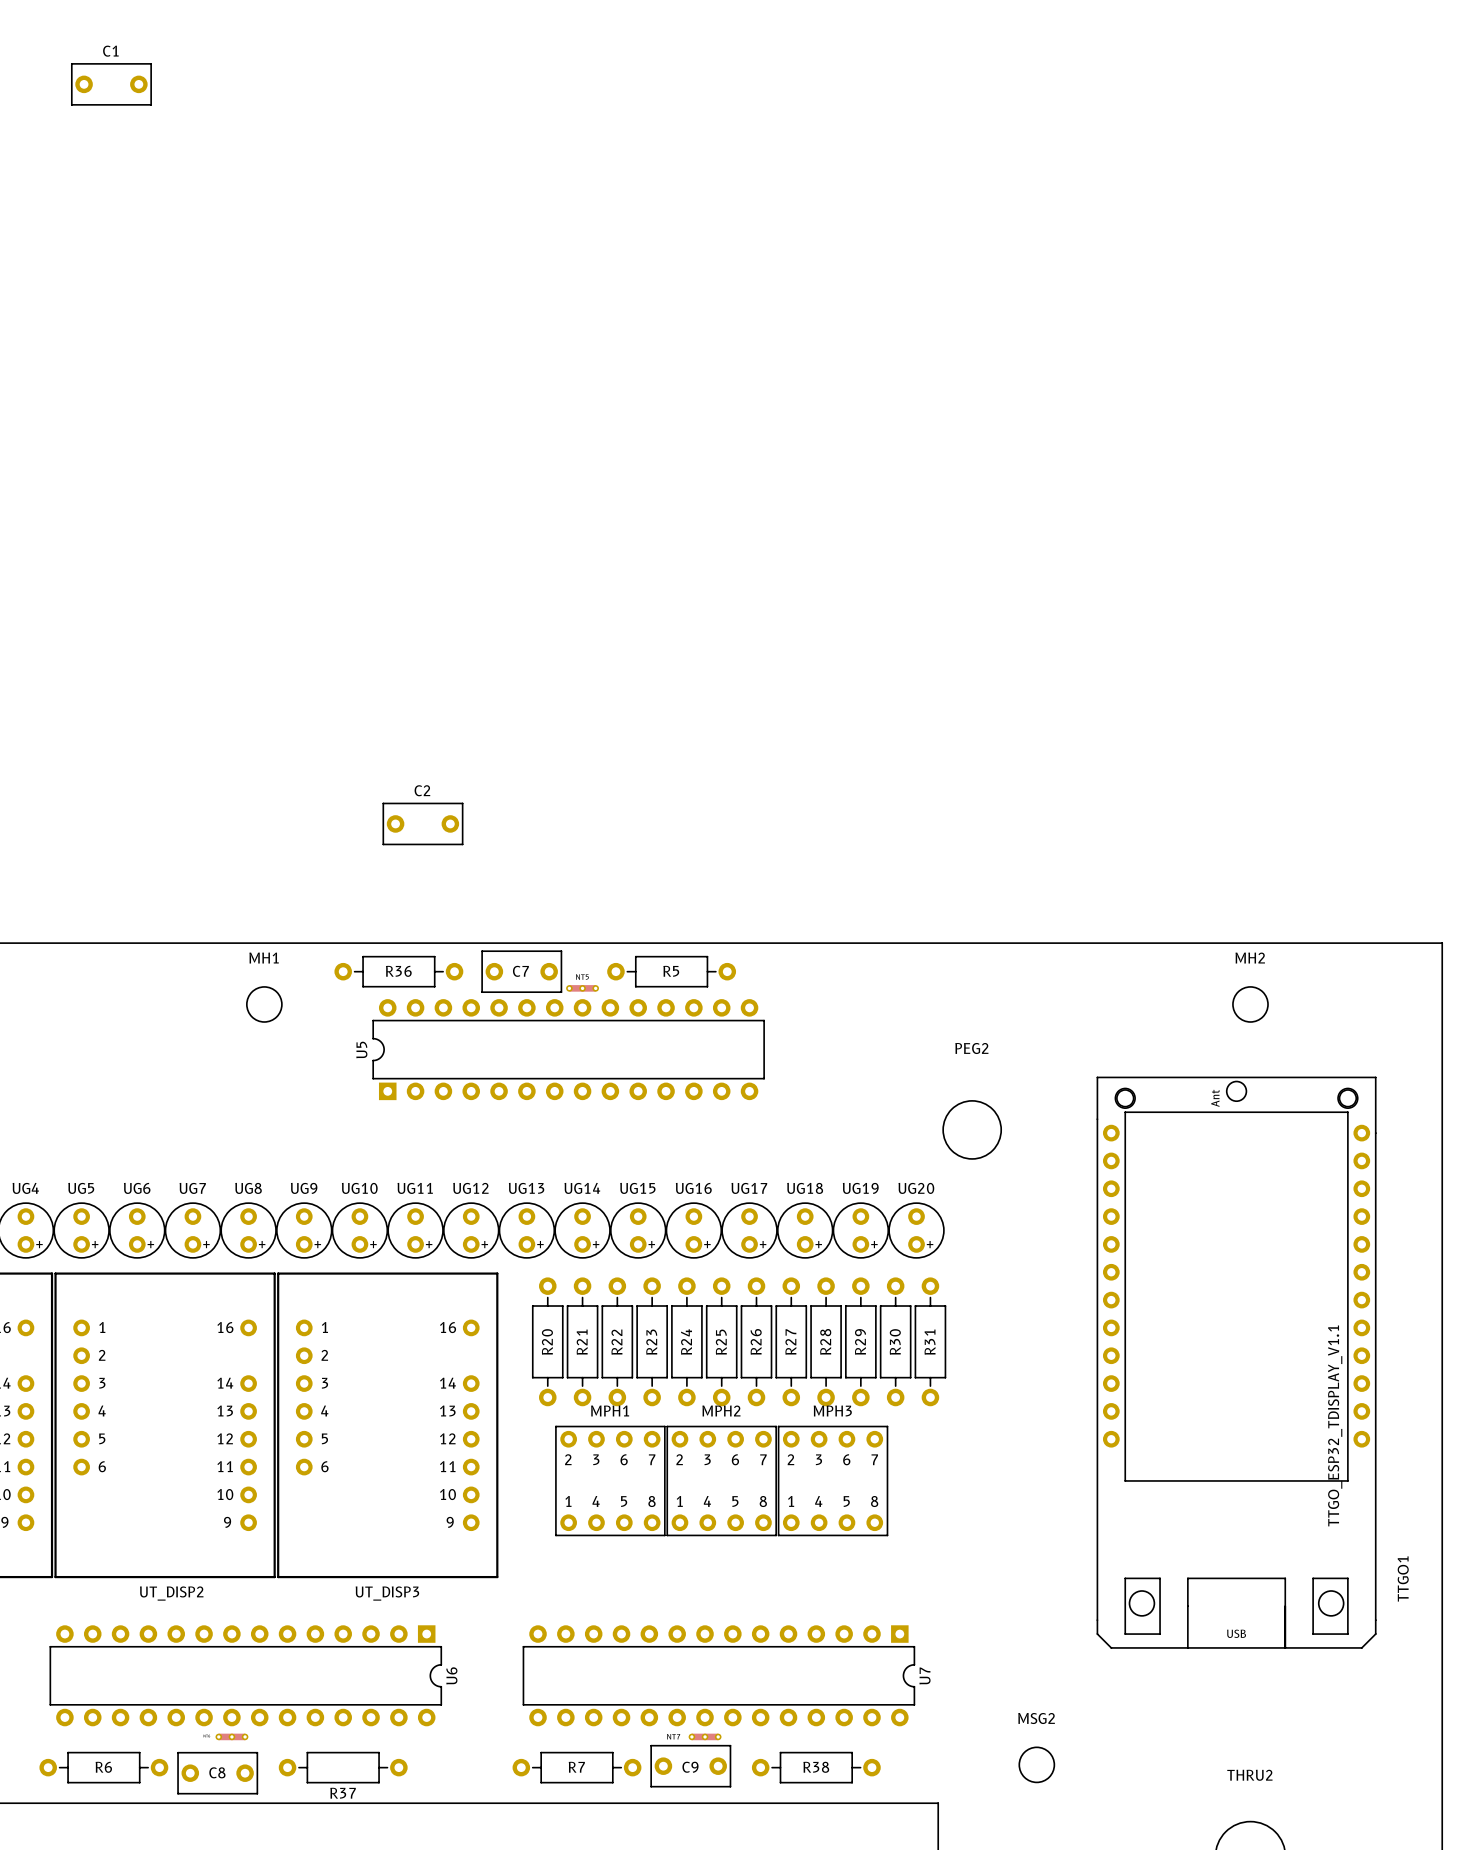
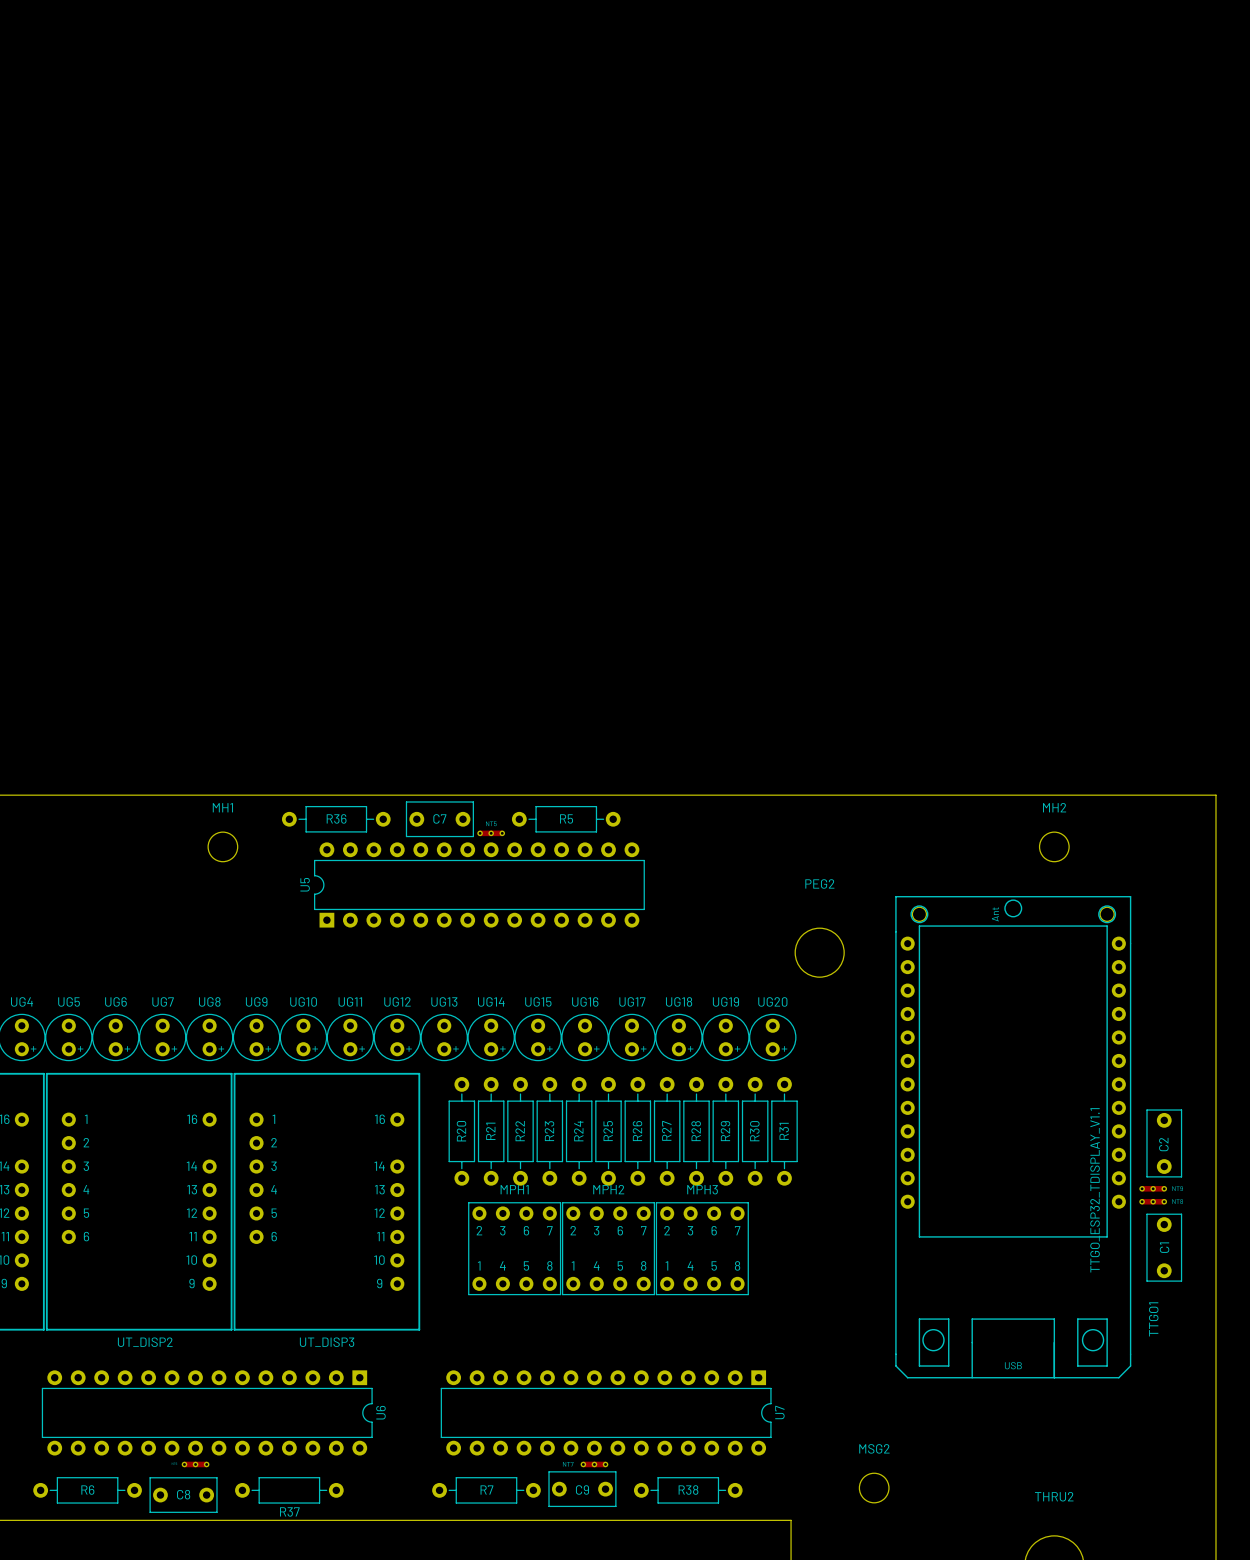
C1 name position: C1 (110, 51) -> C1 (1164, 1247)
C1 rotation: 0° (111, 84) -> 90° clockwise (1164, 1247)
C1 position: (111, 84) -> (1164, 1247)
C2 name position: C2 (422, 790) -> C2 (1163, 1144)
C2 rotation: 0° (422, 823) -> 90° clockwise (1164, 1143)
C2 position: (422, 823) -> (1164, 1143)
TTGO1 position: (1236, 1362) -> (1013, 1137)
part: none -> (1153, 1188)
part: none -> (1153, 1201)

